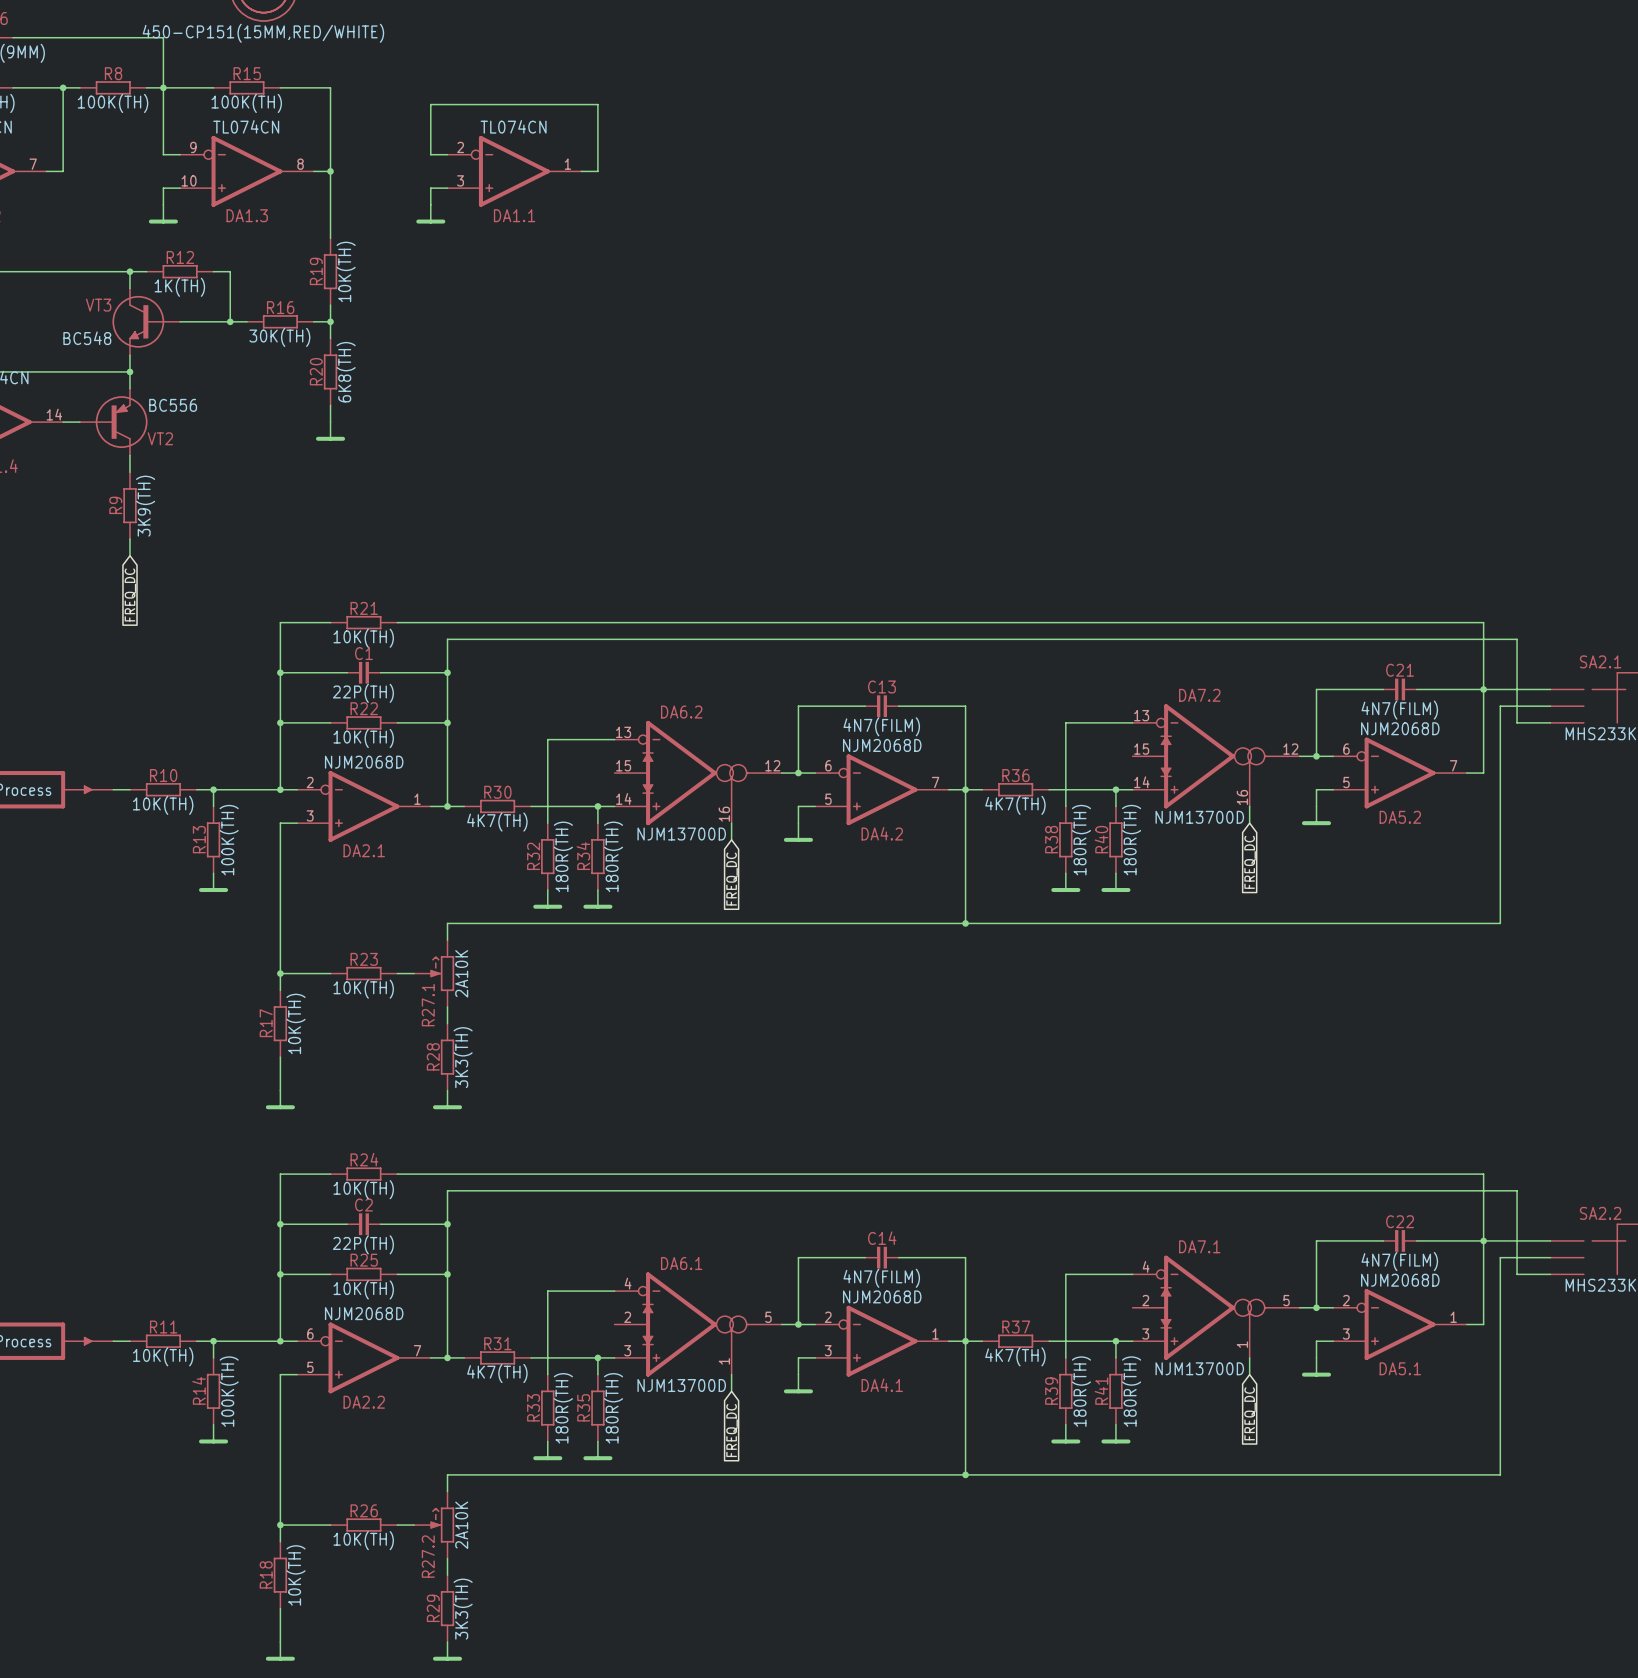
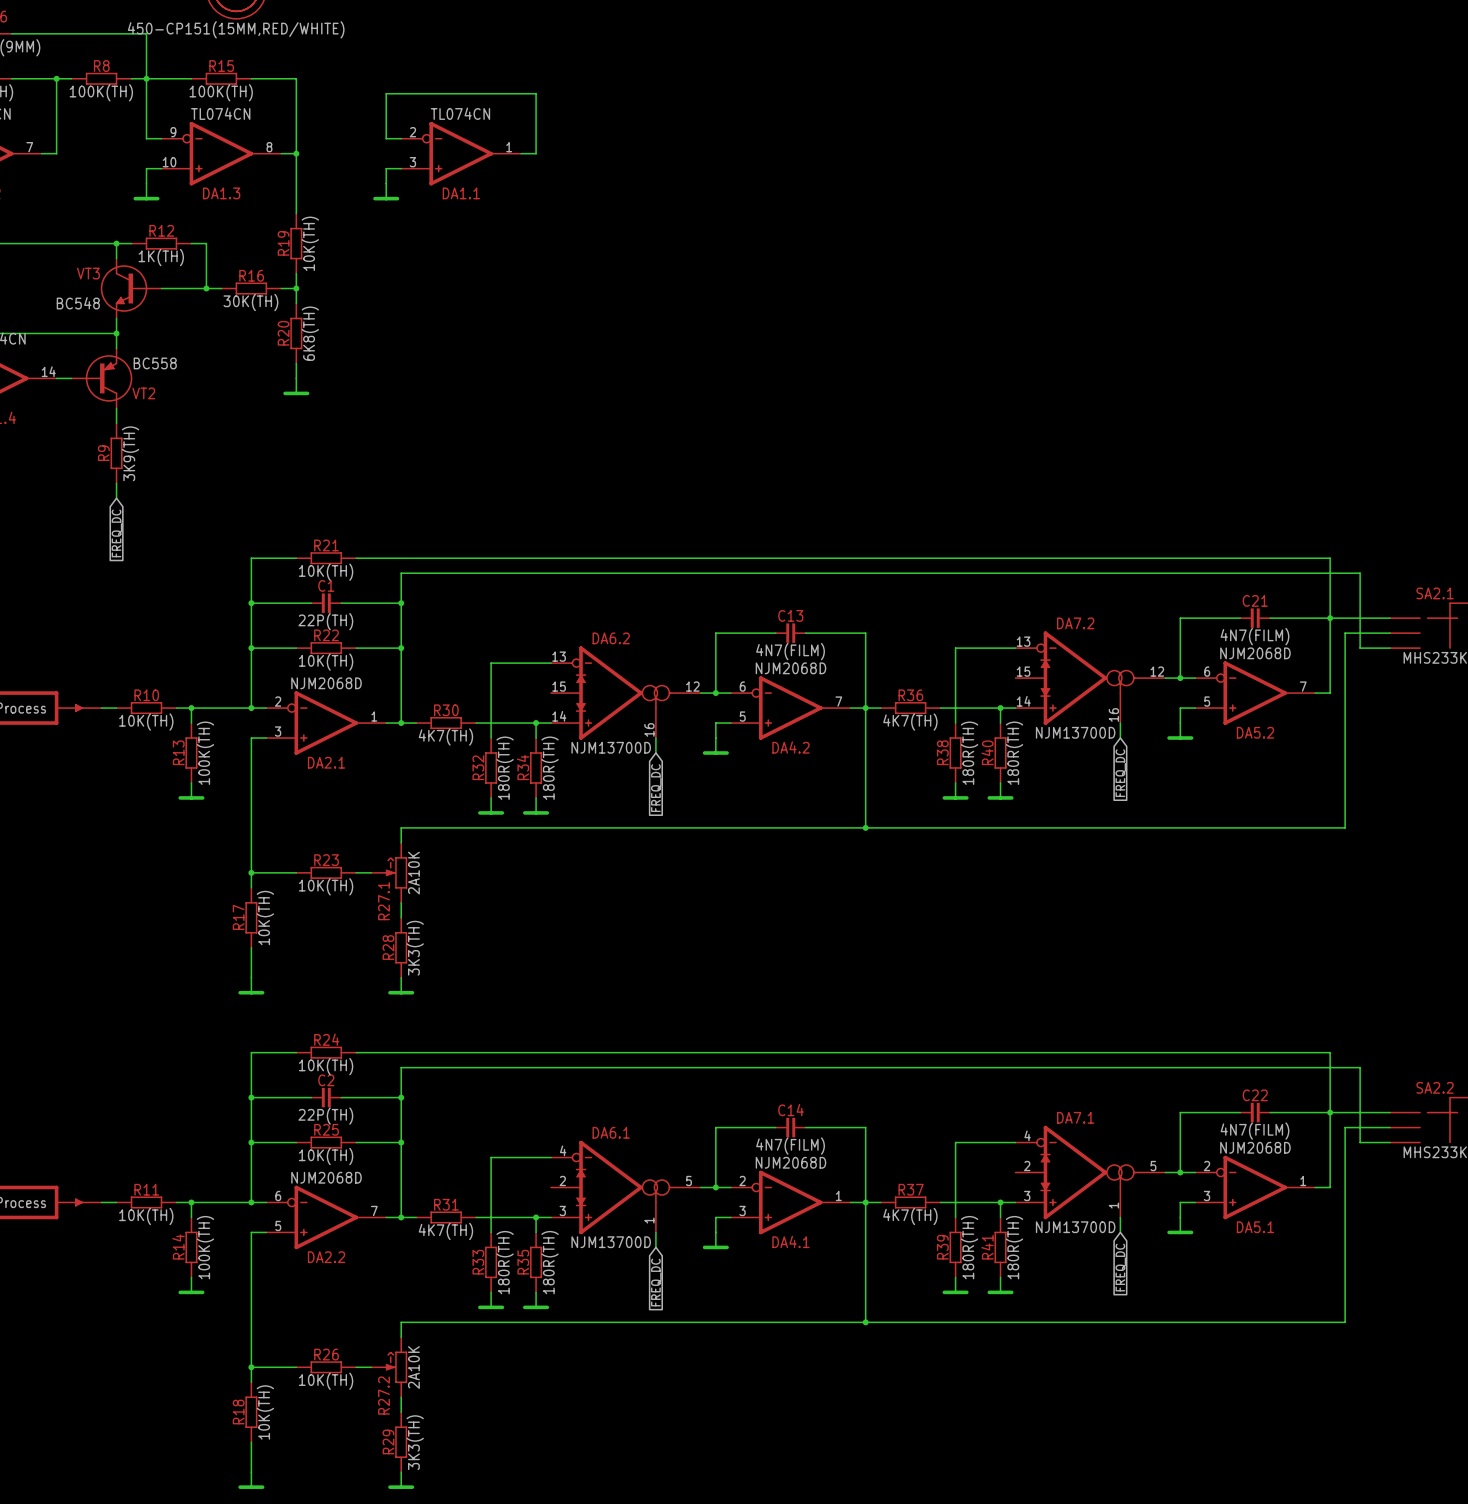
VT2 value: BC556 (173, 405) -> BC558 (155, 363)

